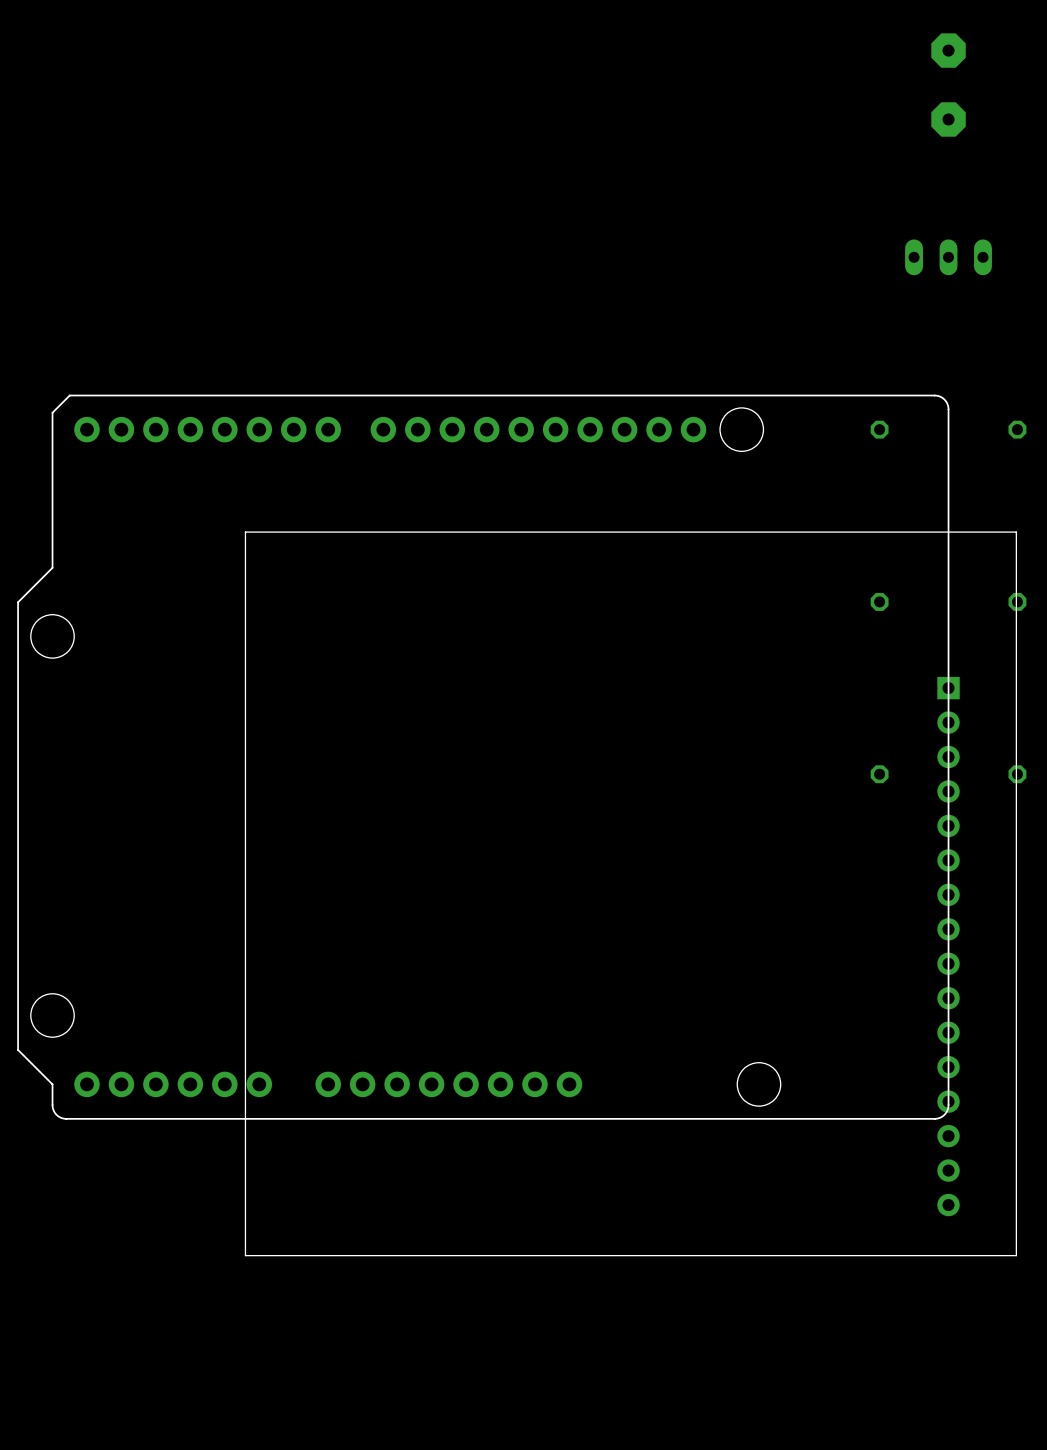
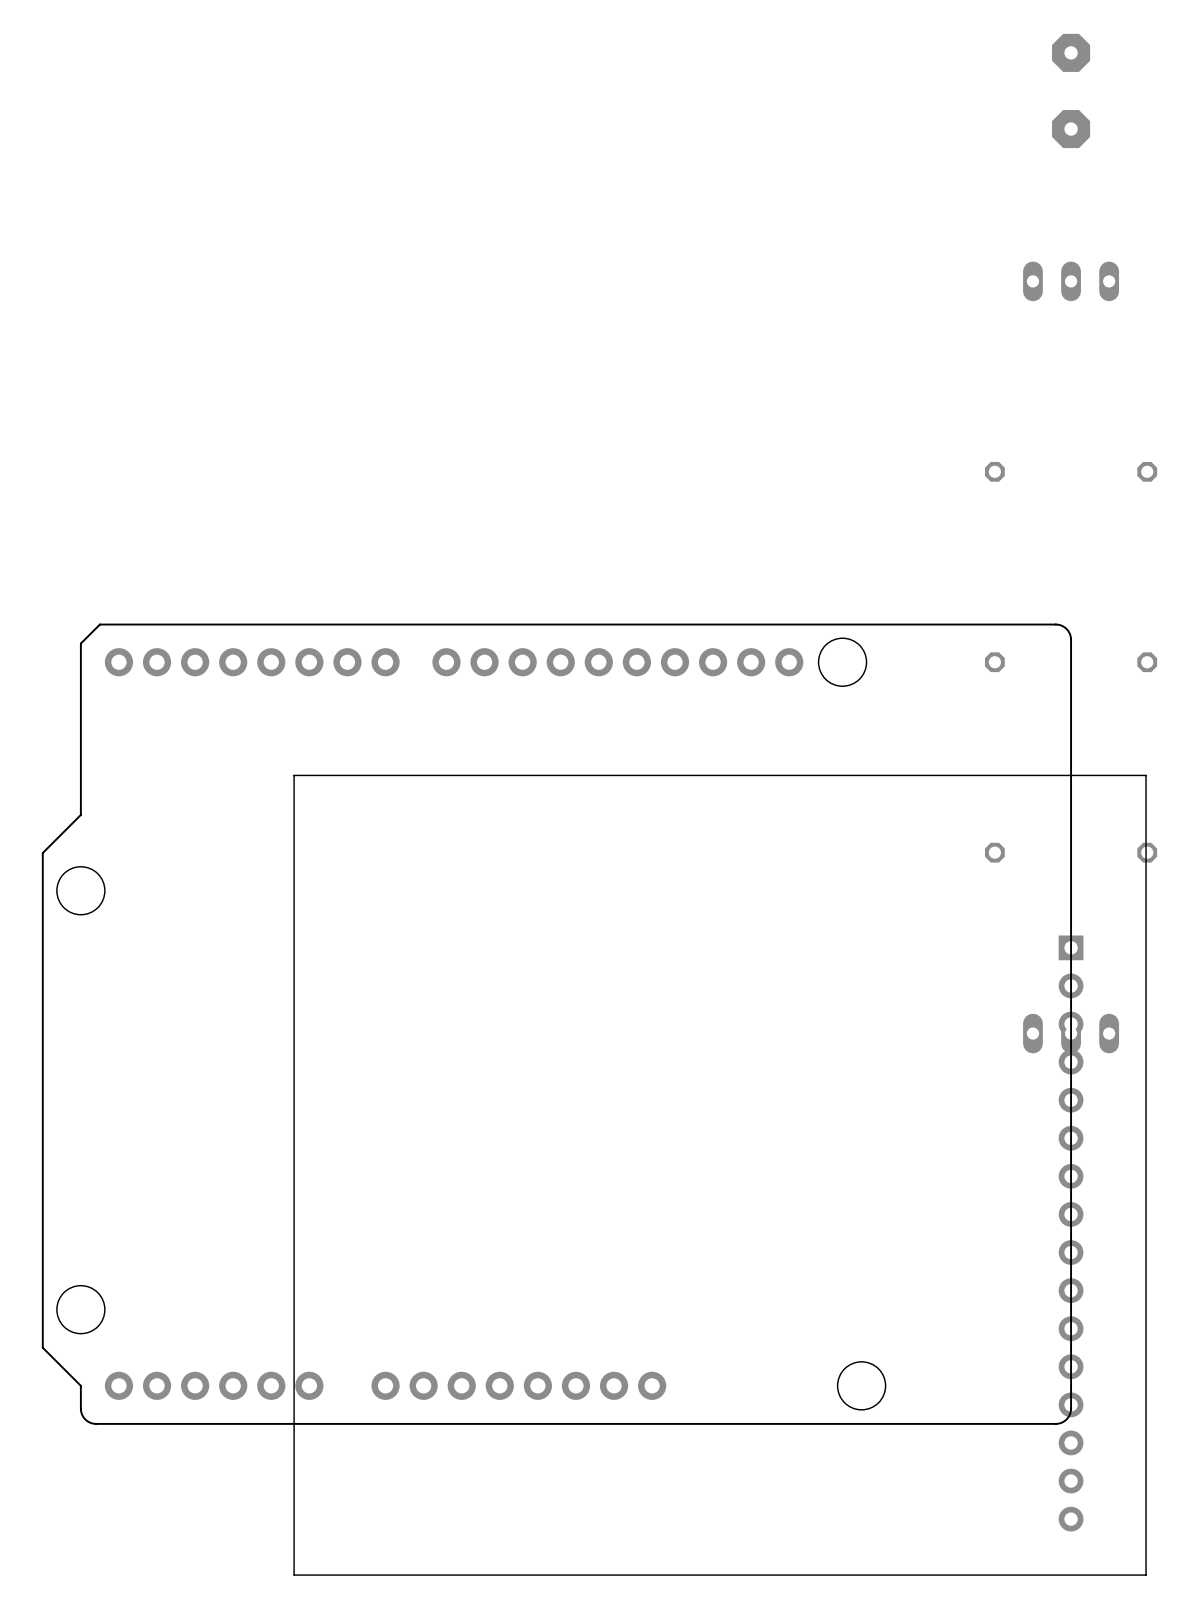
part footprint: [937, 676, 960, 1217] -> [1023, 1013, 1120, 1054]
board edge: (1016, 704) (1016, 532) (245, 532) (245, 704) -> (1146, 775) (294, 775)
part position: (483, 757) -> (556, 1024)
part: none -> (1071, 1233)
board edge: (1016, 1255) (245, 1255) -> (1146, 1384) (1146, 1575) (294, 1575) (294, 1384)

